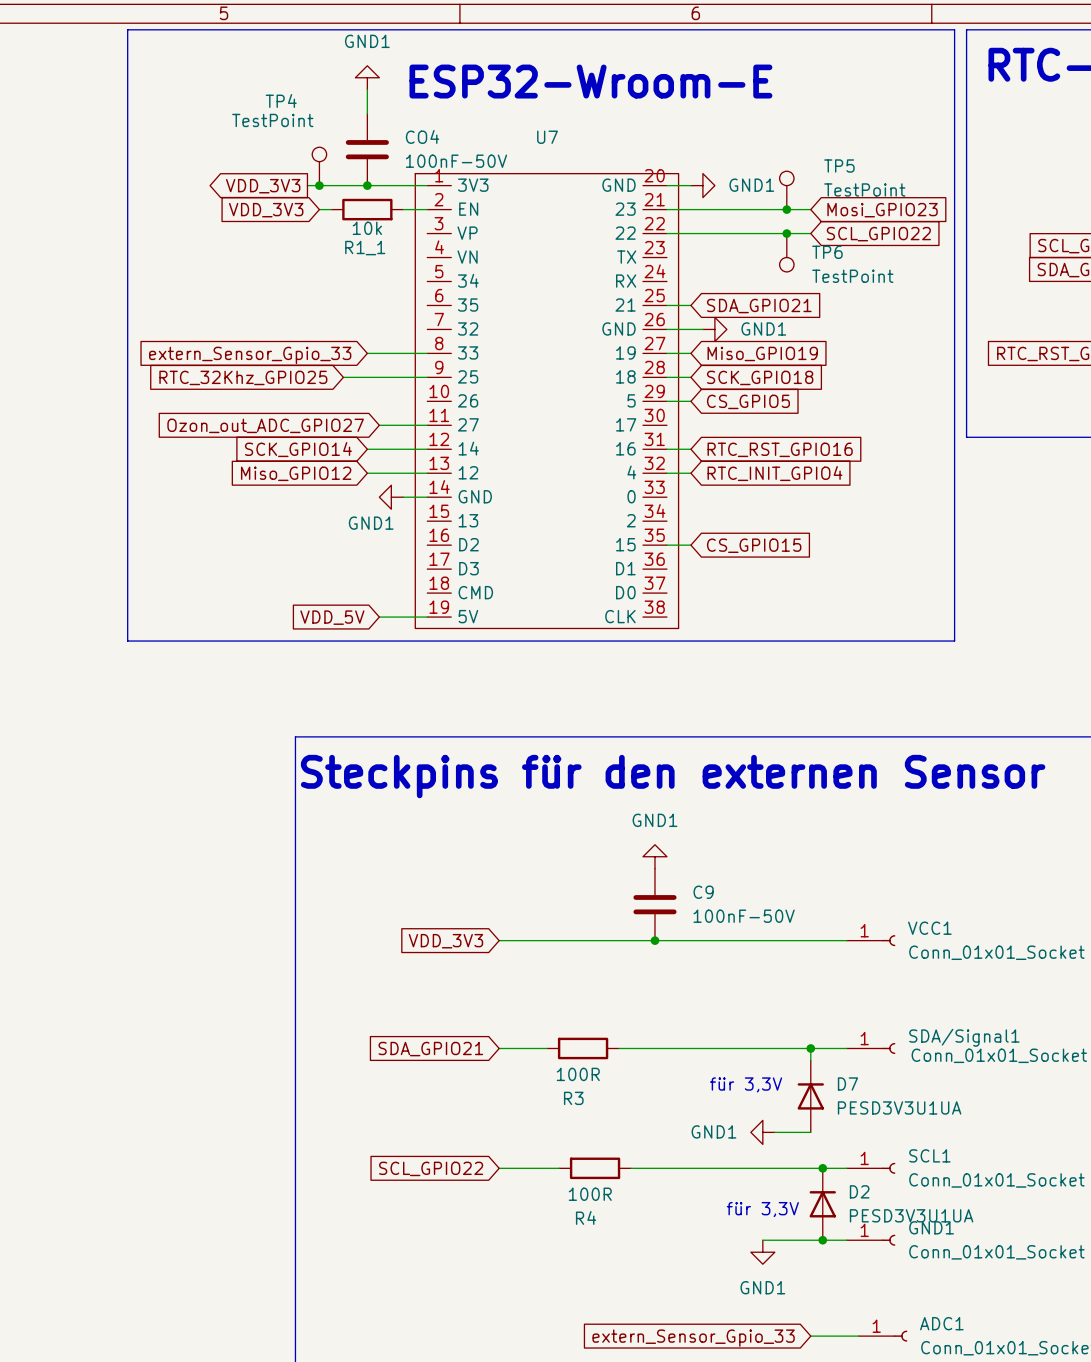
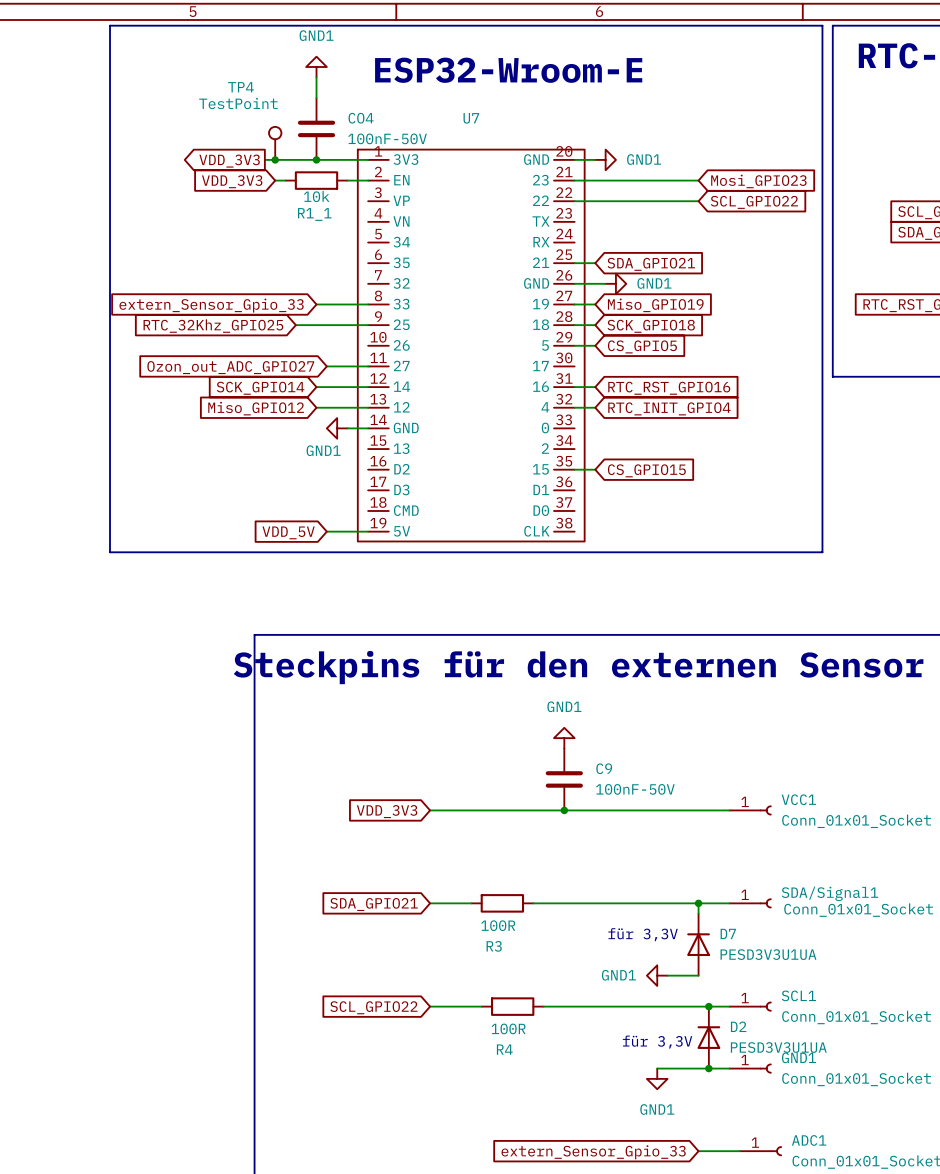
TP5: TestPoint (786, 190) -> none
junction: (786, 209) -> none
junction: (786, 233) -> none
TP6: TestPoint (786, 252) -> none

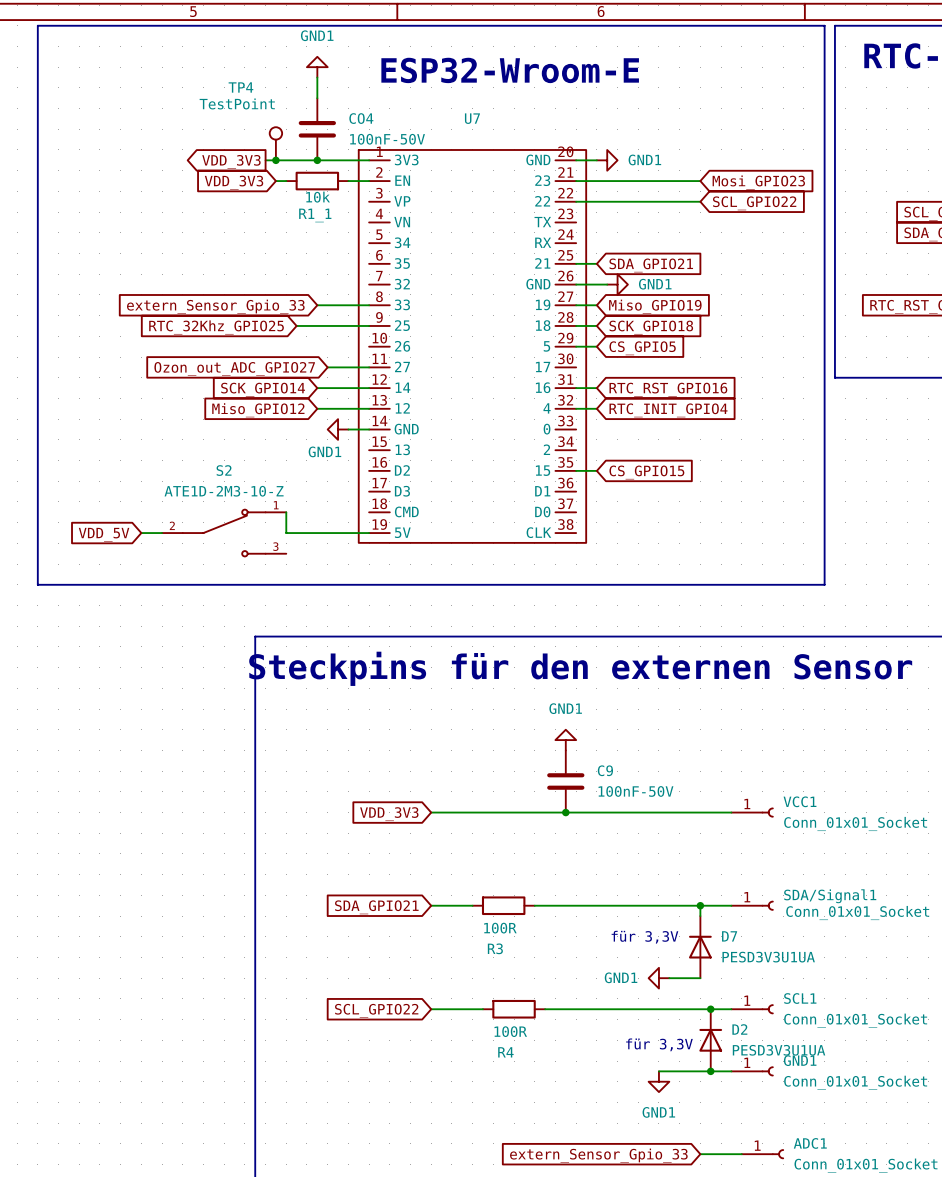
line: (110, 25) (110, 552) (822, 552) -> (110, 25) (37, 25) (37, 584) (824, 584) (824, 553)
wire: none -> (286, 512) (286, 533) (327, 533)
wire: none -> (141, 533) (162, 533)
S2: none -> ATE1D-2M3-10-Z (224, 533)
global label position: VDD_5V (288, 532) -> VDD_5V (104, 534)

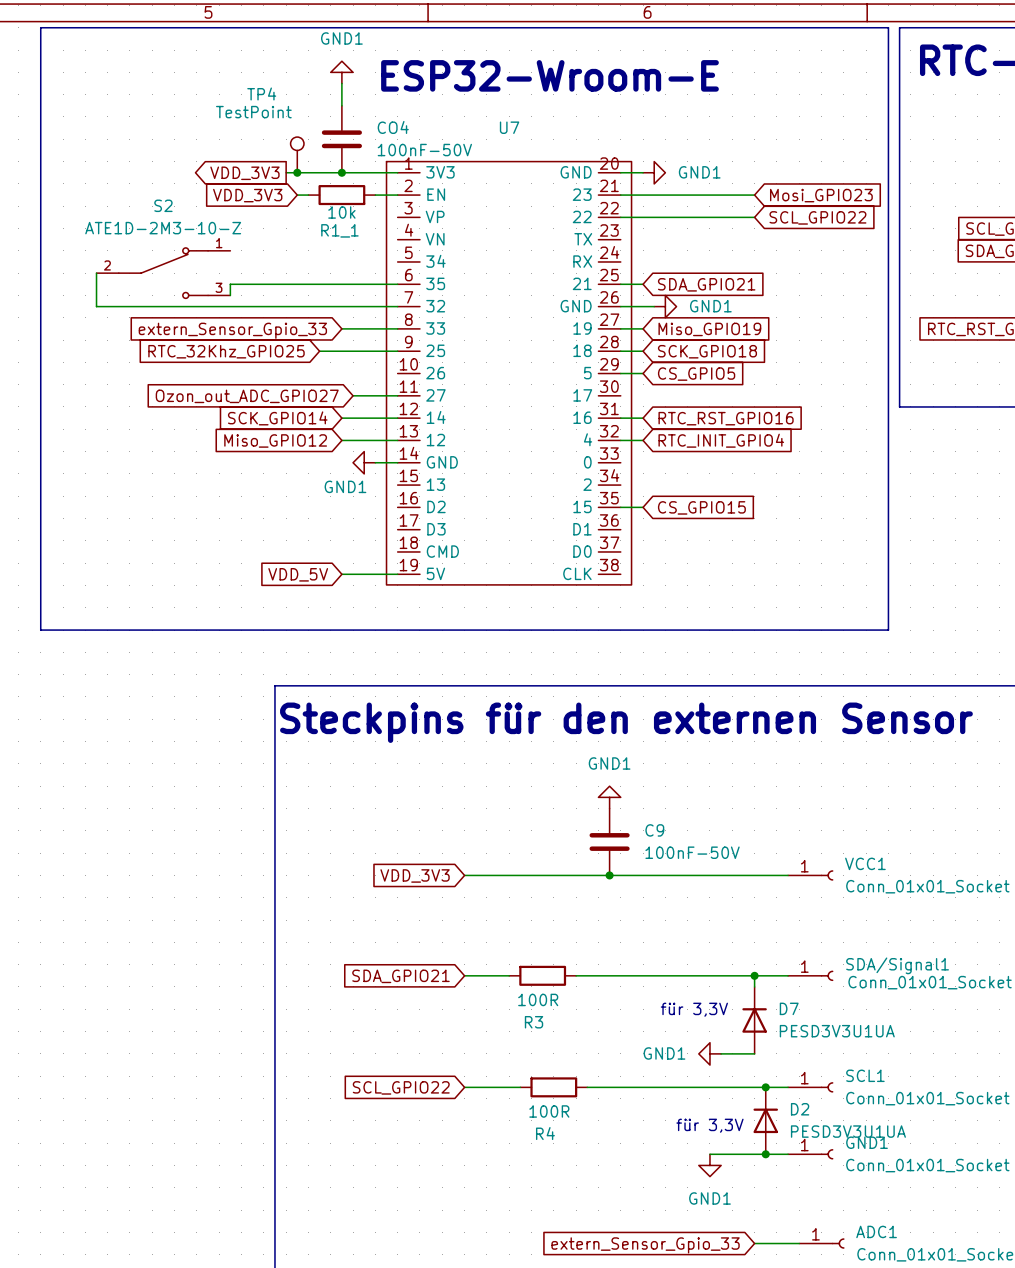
wire: none -> (96, 273) (96, 306) (397, 306)
wire: none -> (397, 284) (230, 284) (230, 295)
wire: (286, 512) (286, 533) (317, 533) -> none
wire: (141, 533) (162, 533) -> none
S2 position: (224, 533) -> (163, 273)
global label position: VDD_5V (104, 534) -> VDD_5V (298, 574)

